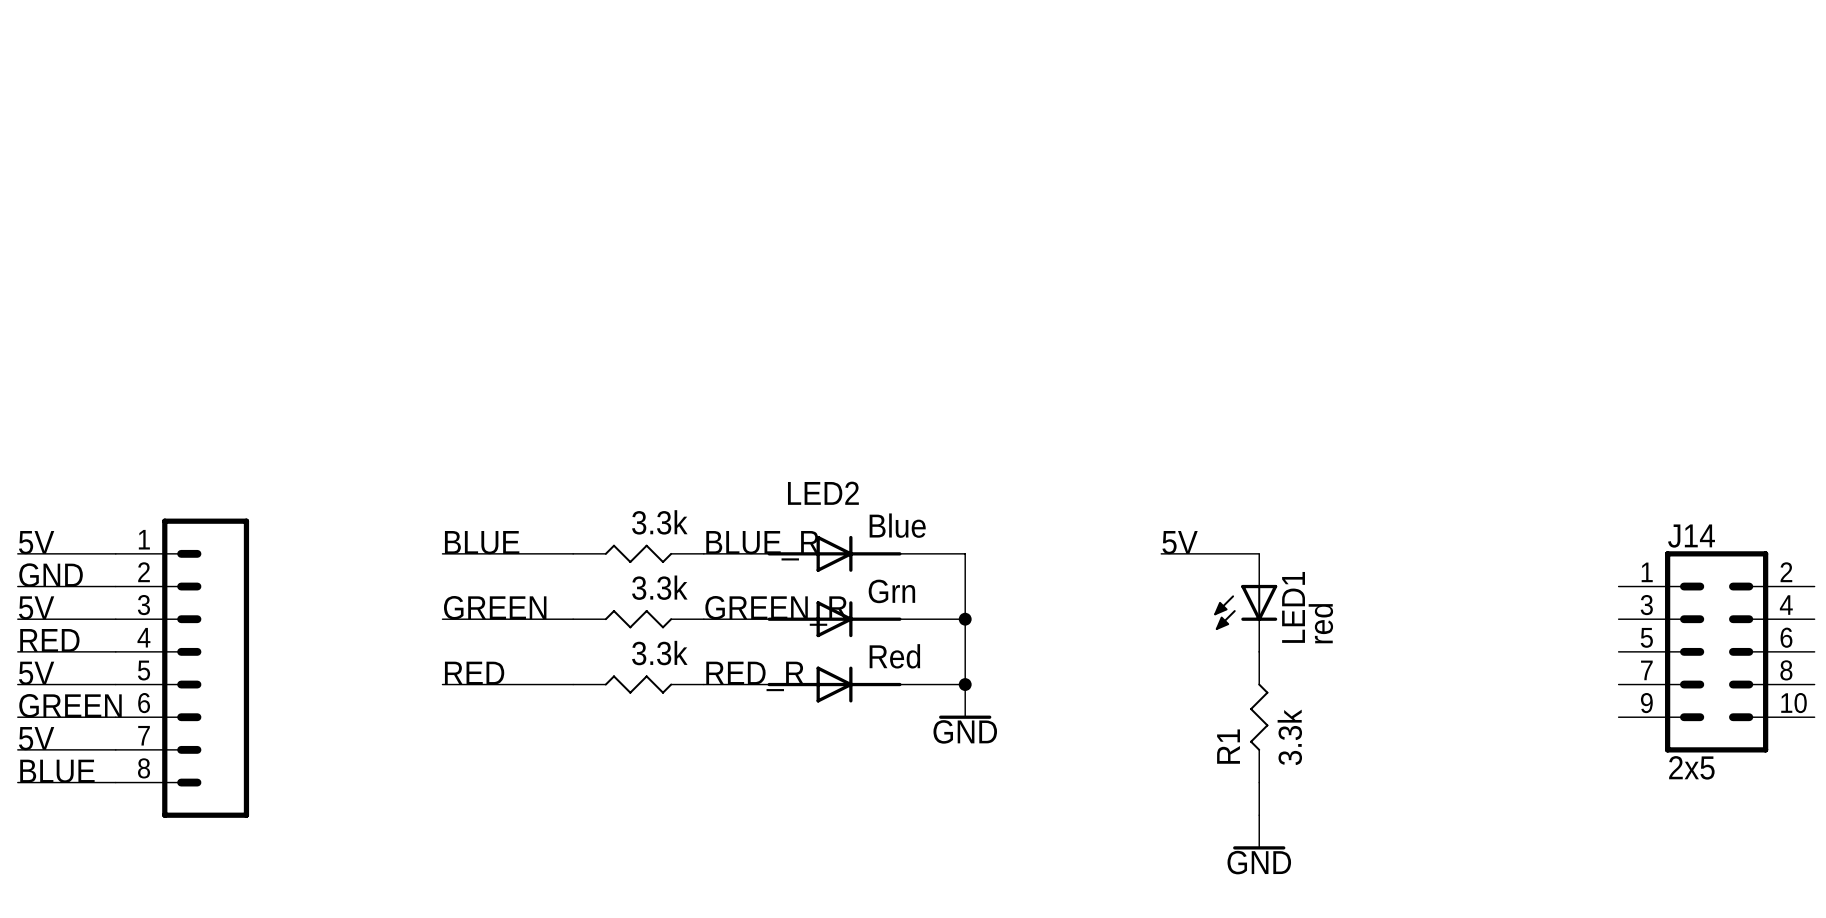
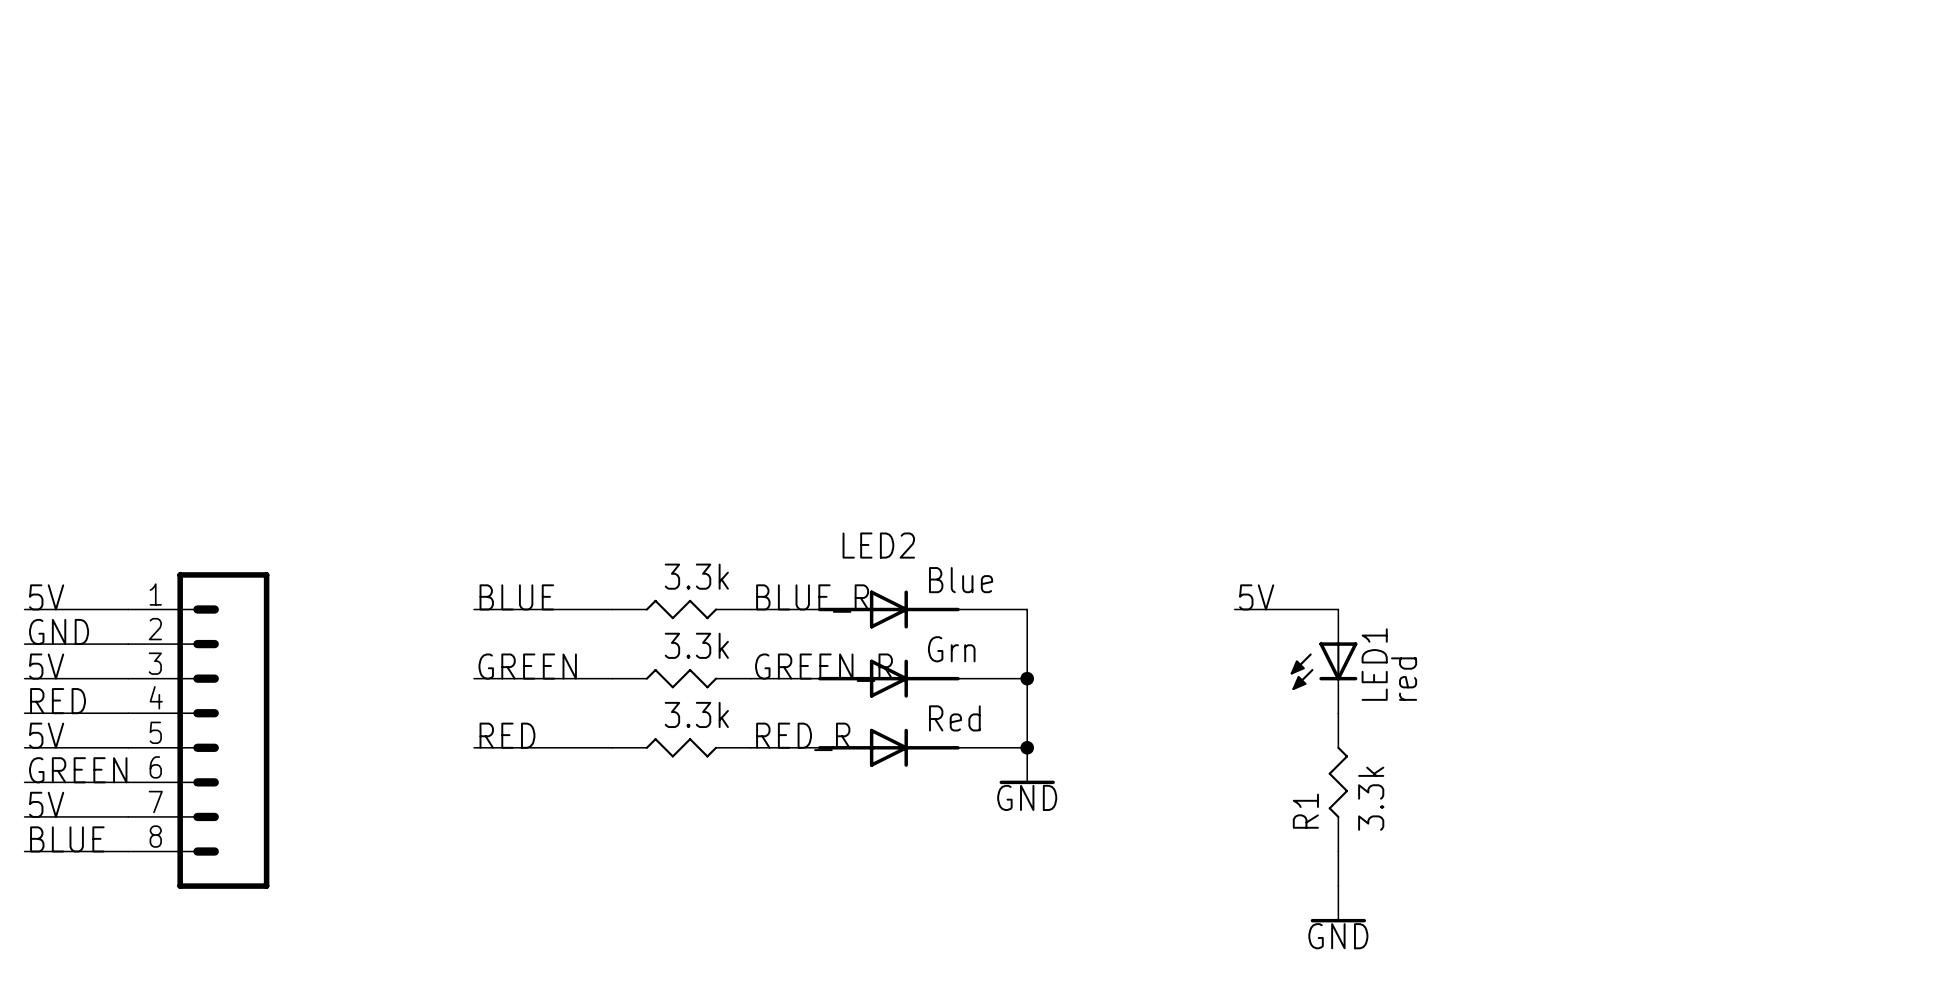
J14: 2x5 (1716, 651) -> none

